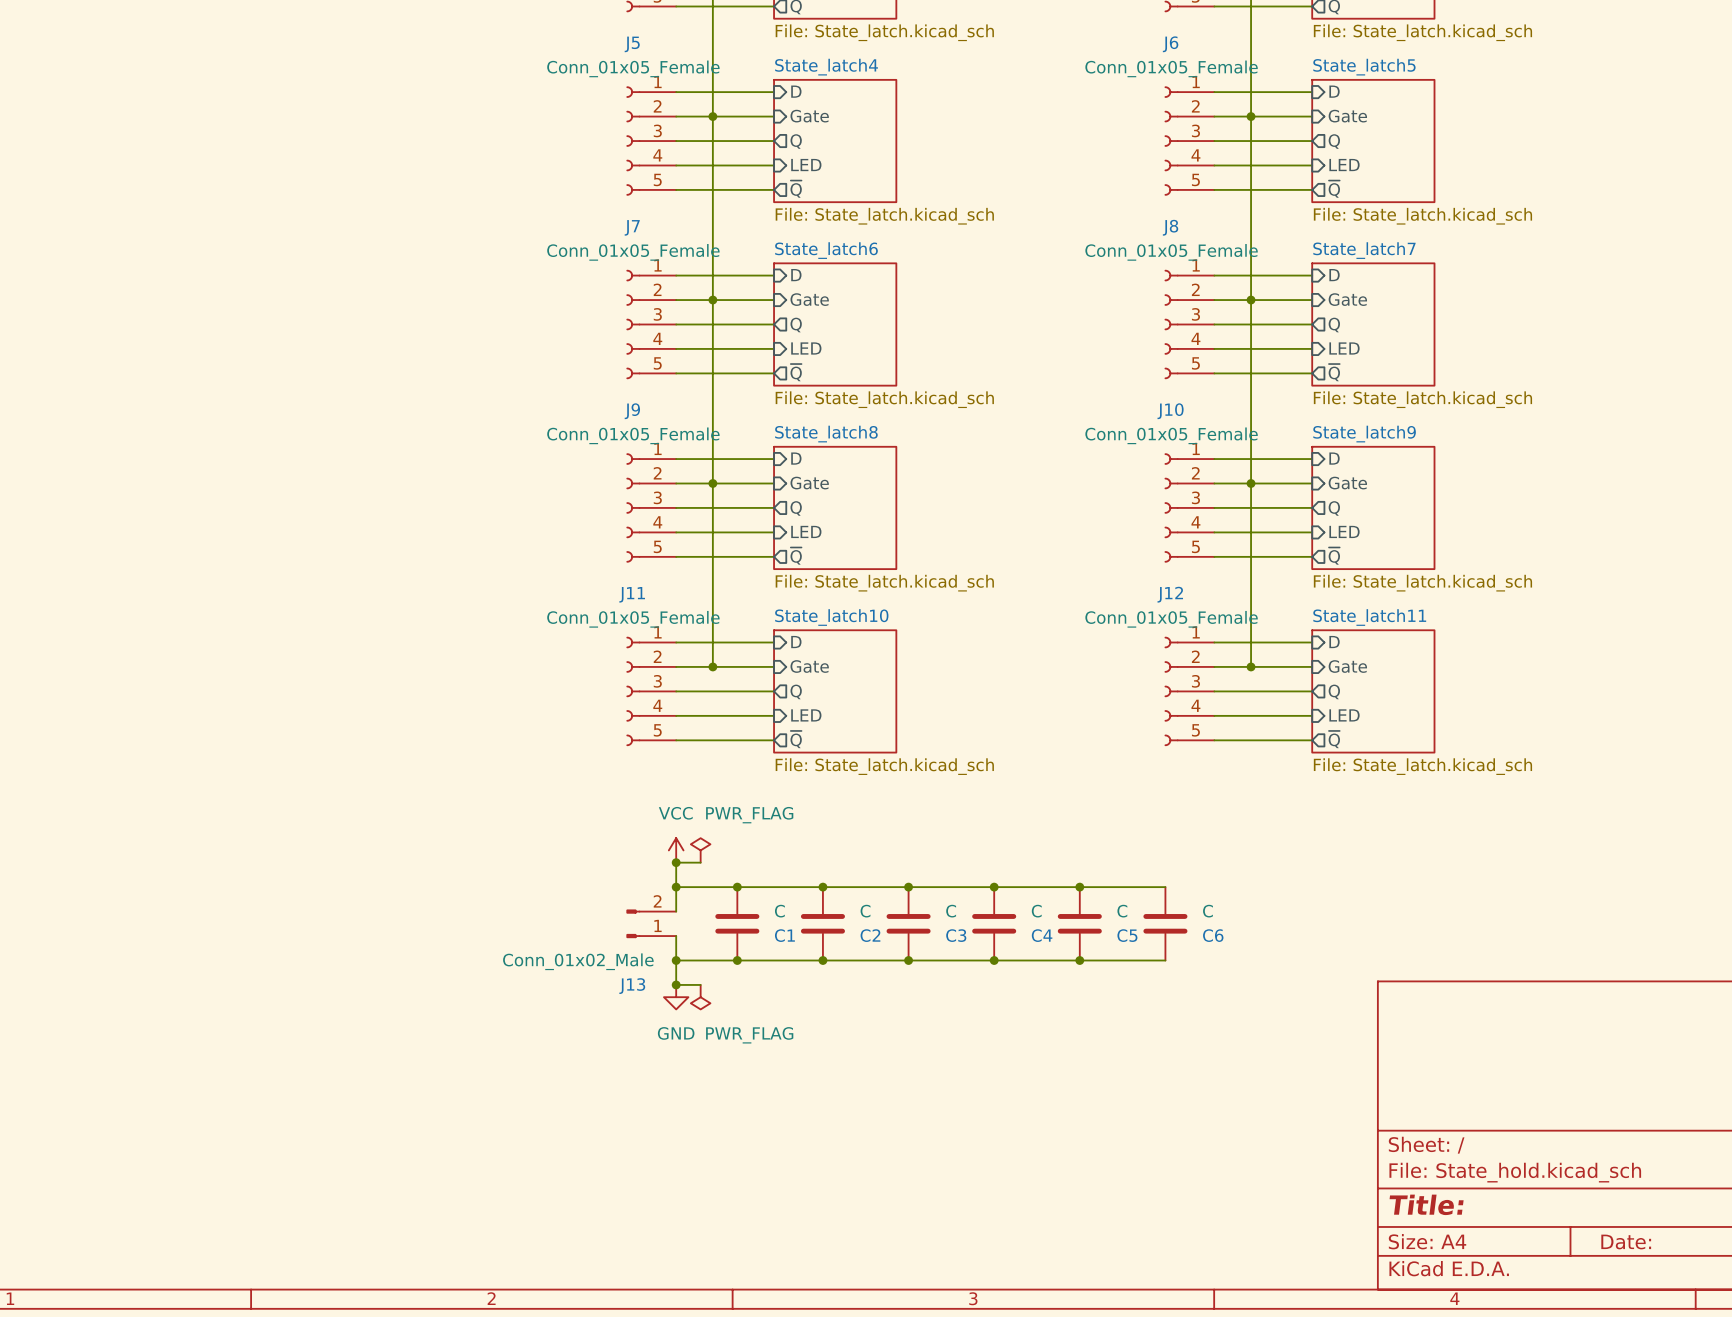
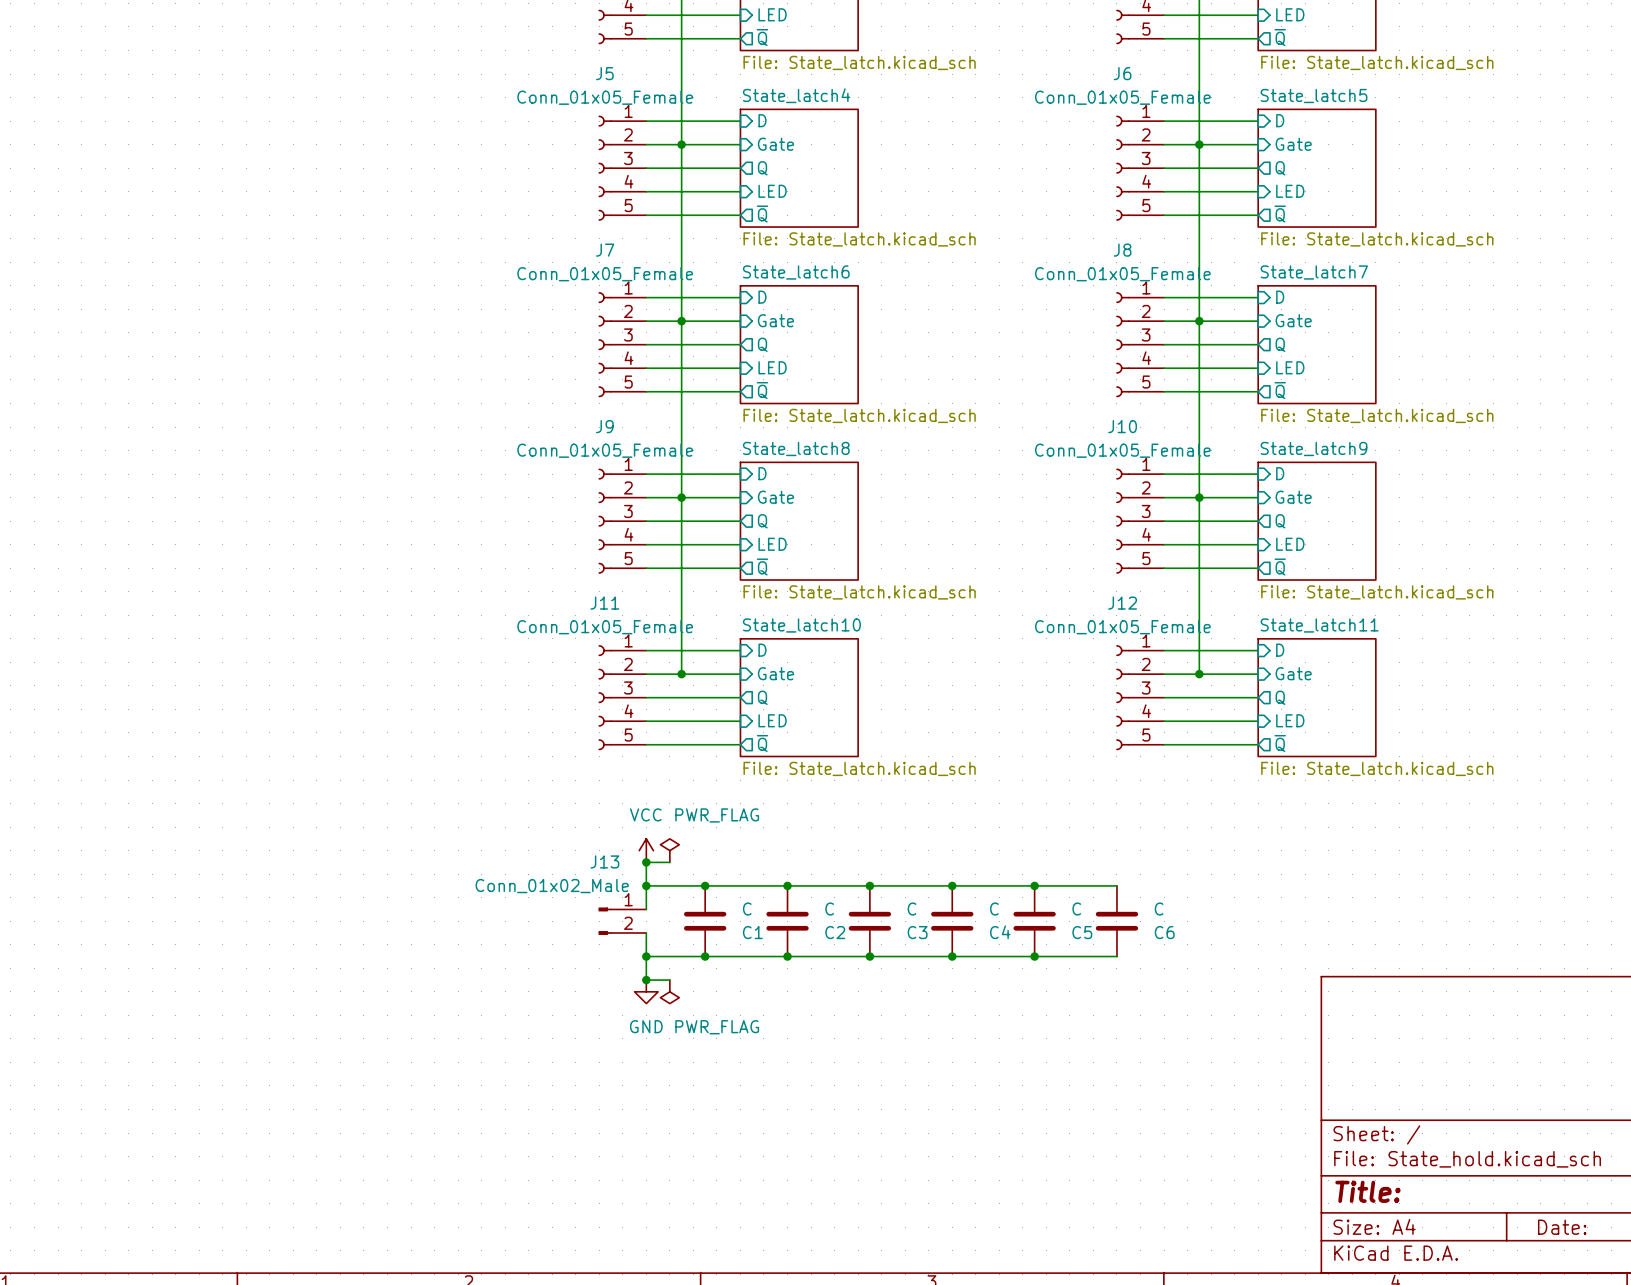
J13 flip: as is (633, 923) -> up-down (605, 921)

